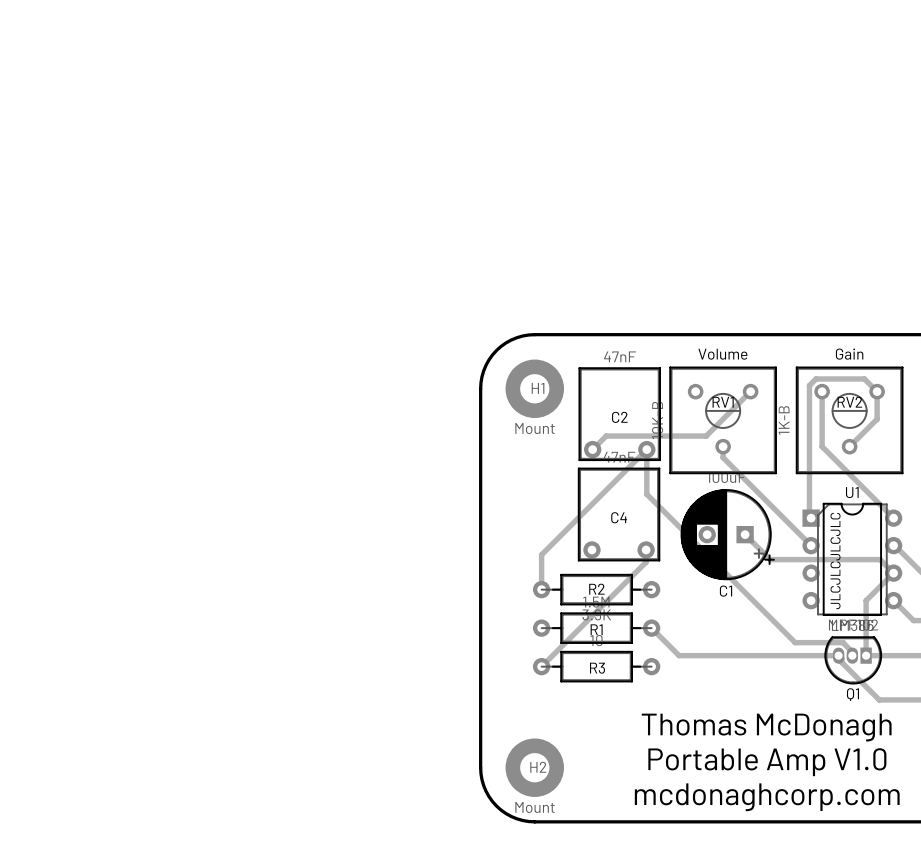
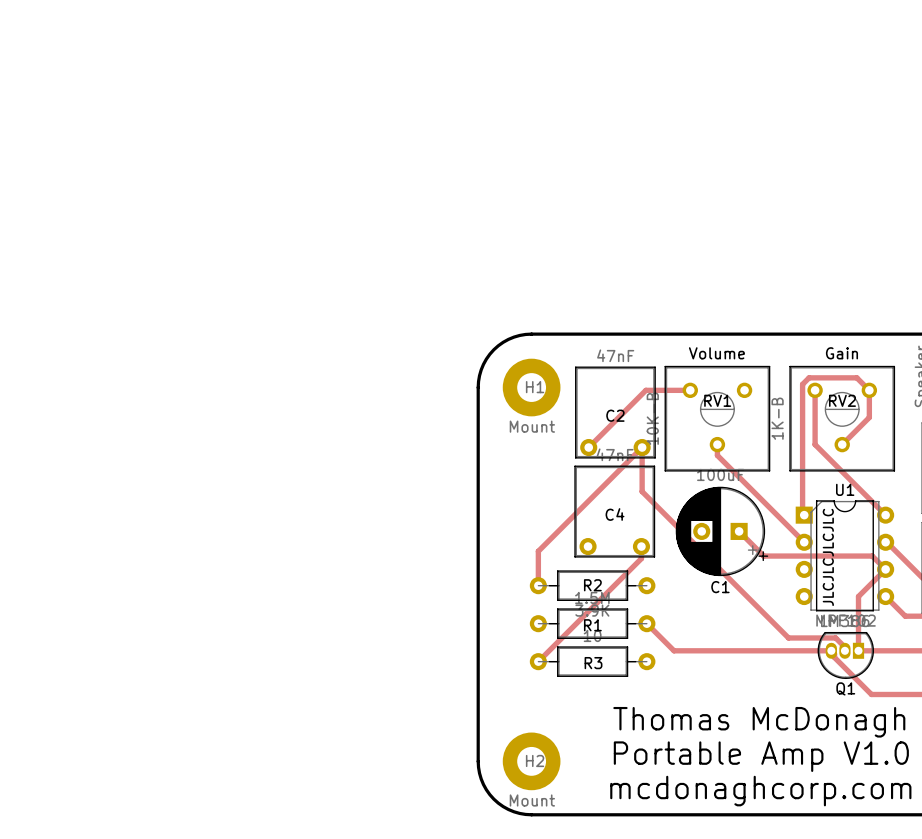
track: (750, 391) (706, 436) (606, 436) -> (690, 390) (645, 390) (602, 434)

